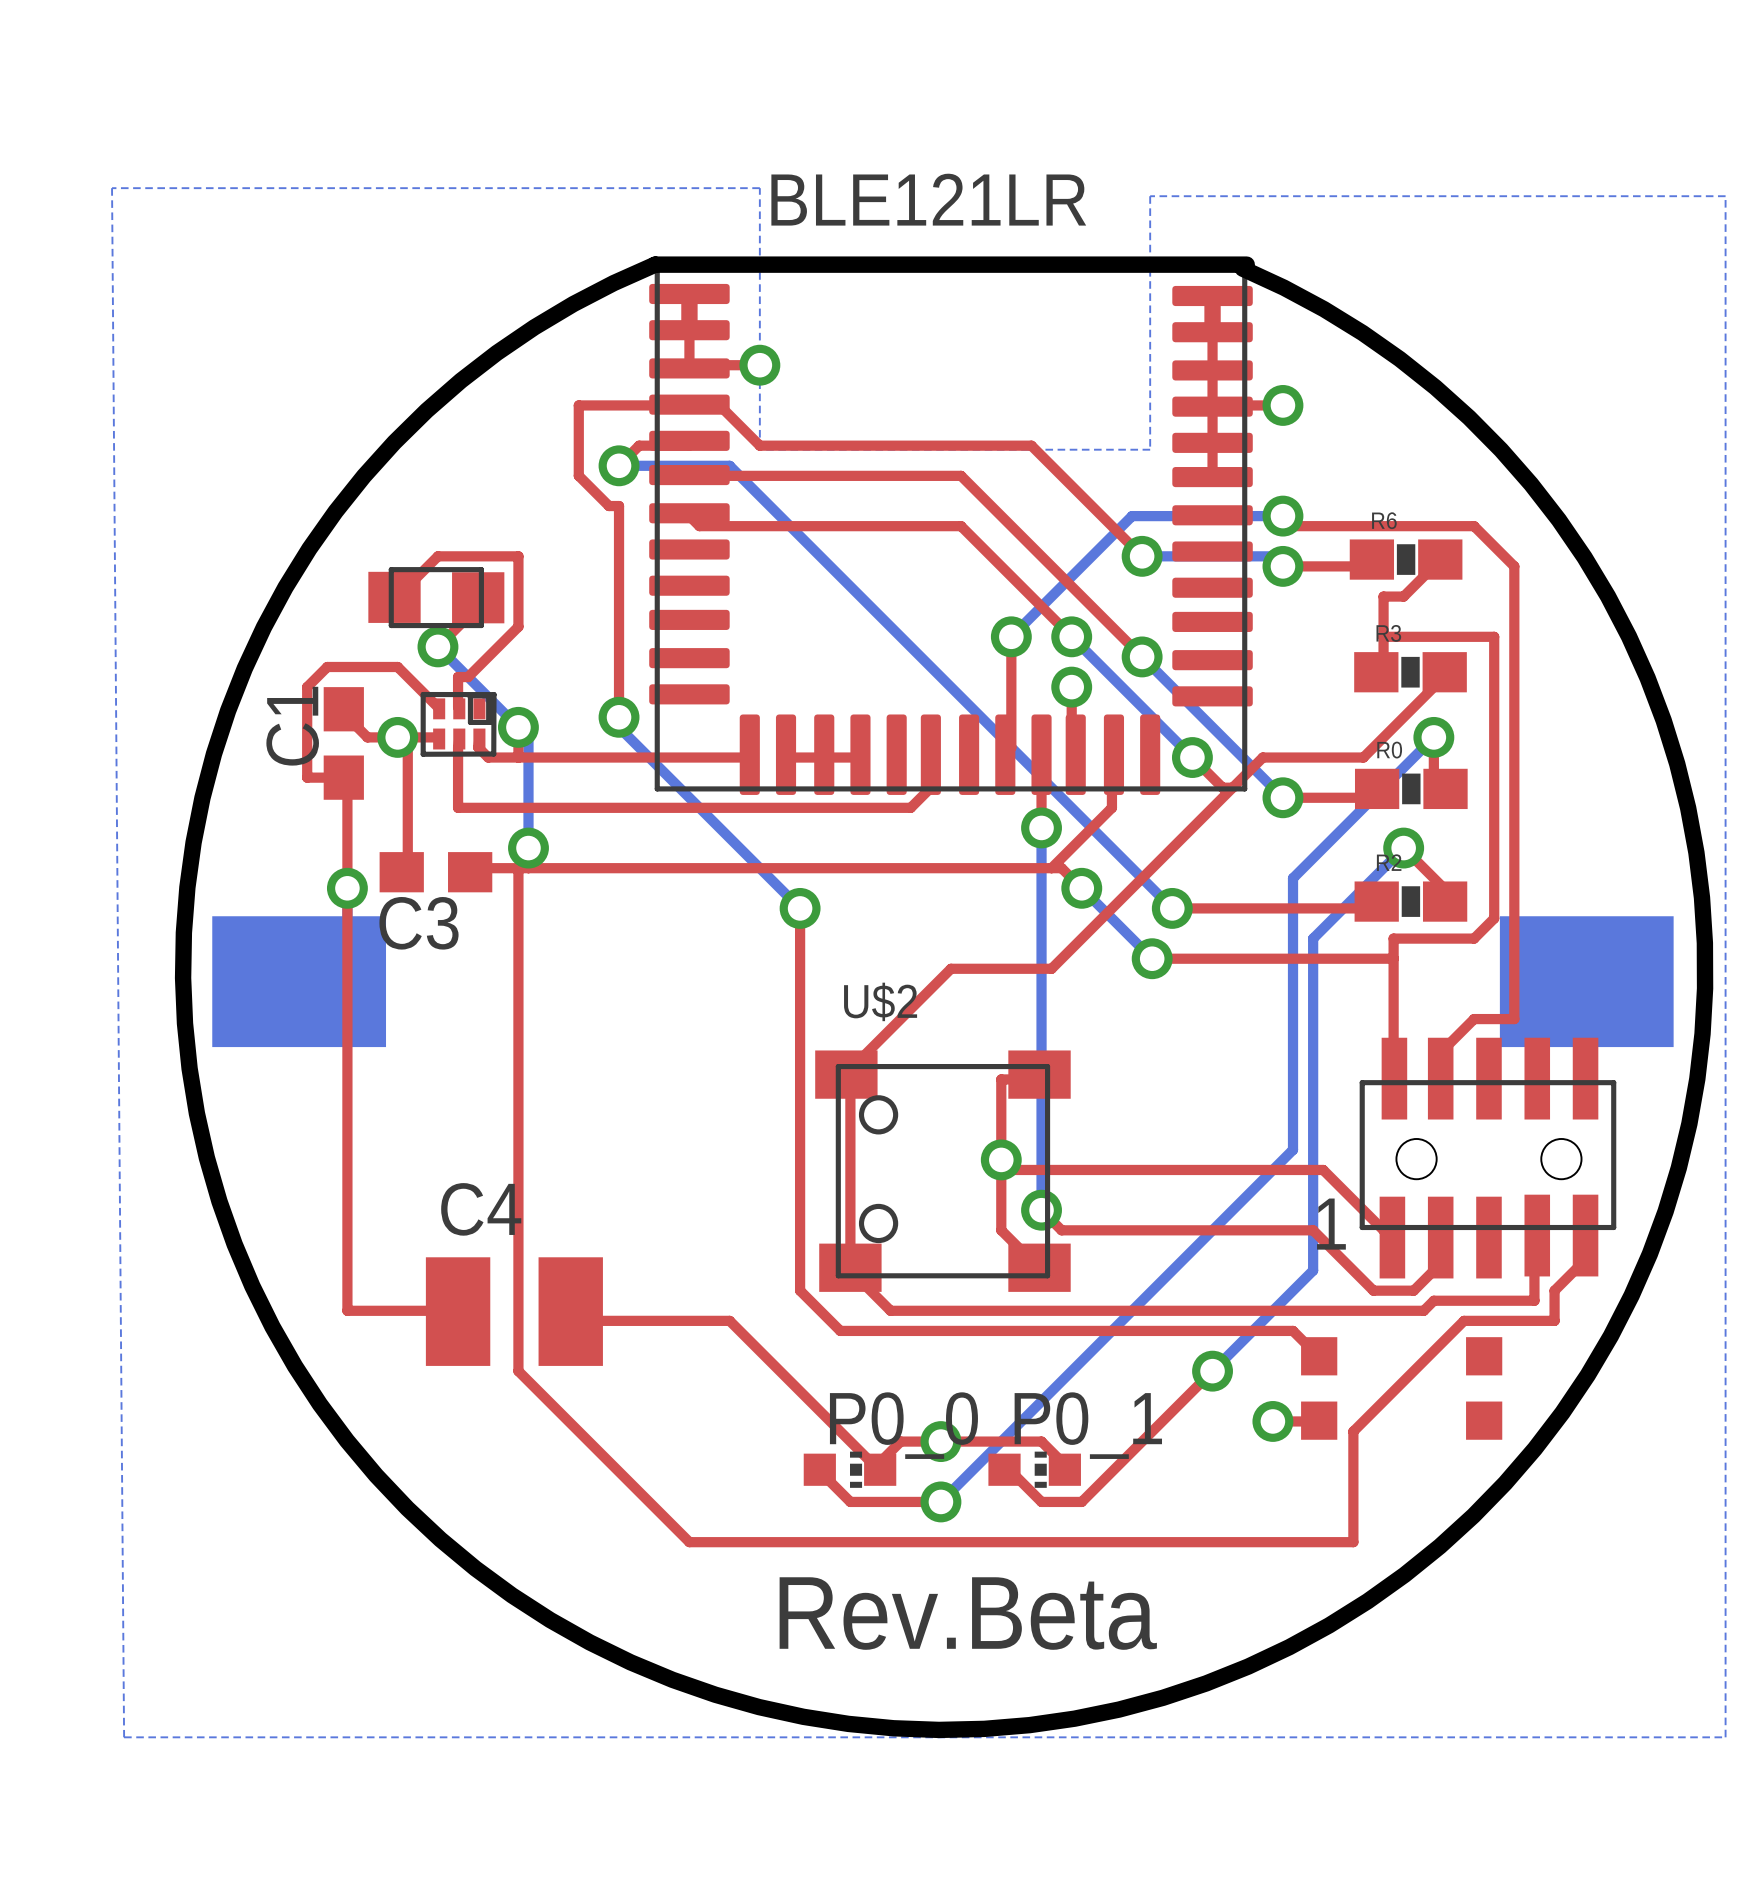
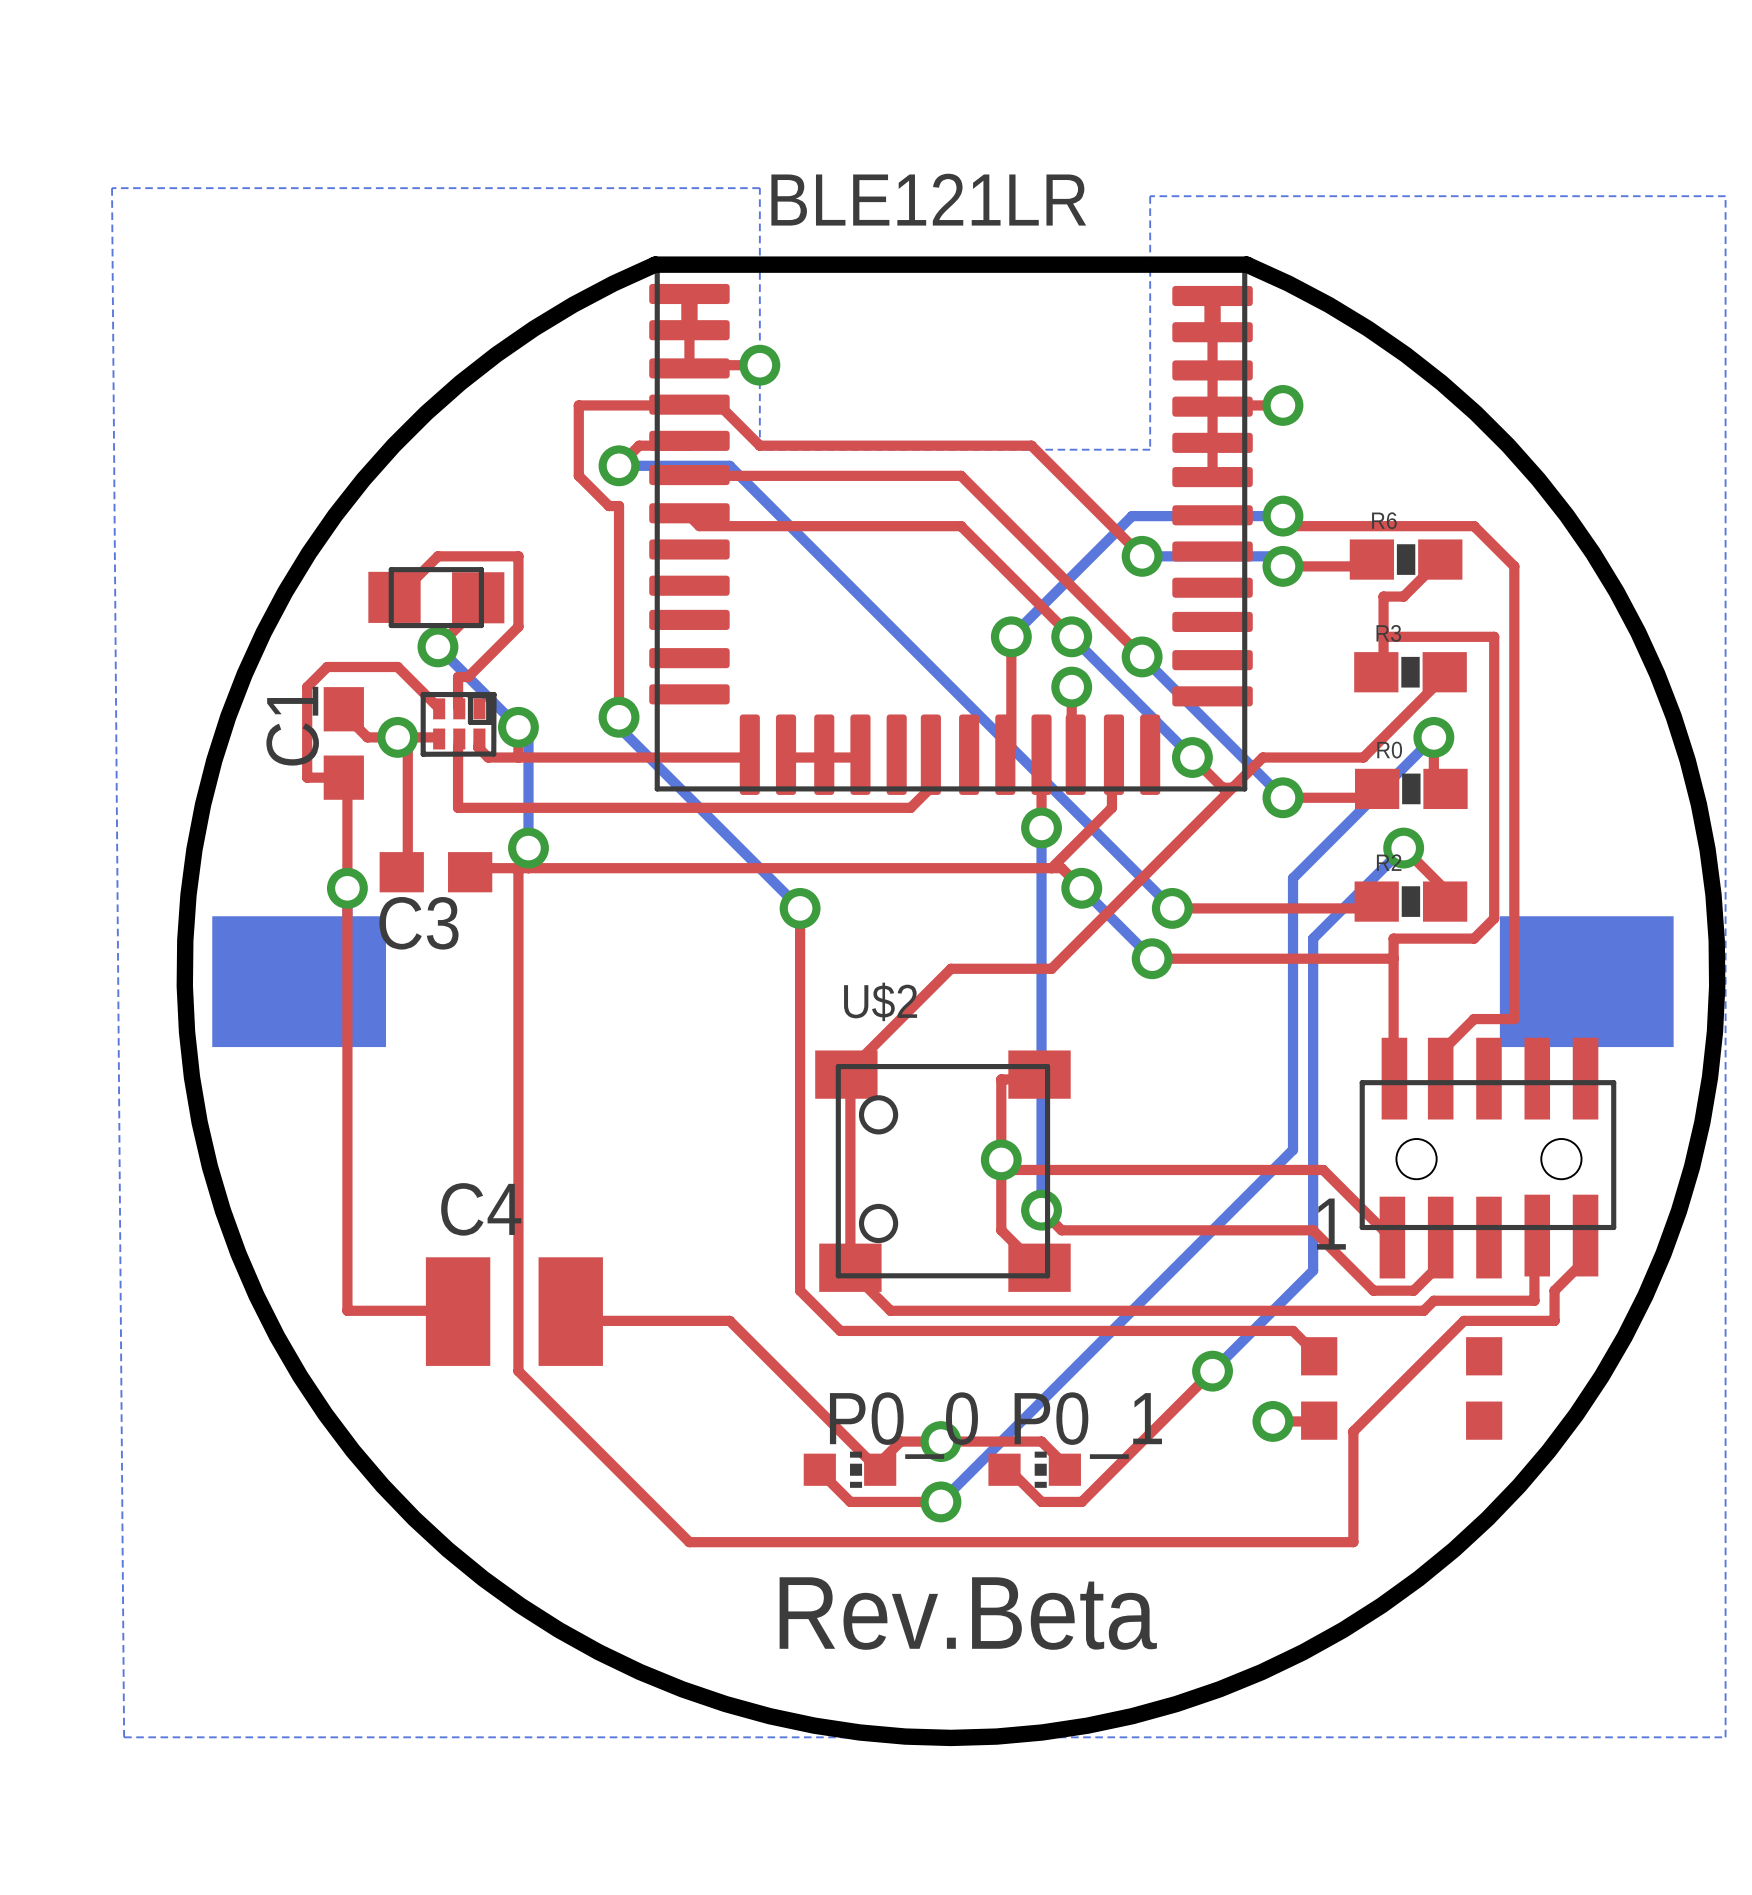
board edge: (655, 264) (573, 304) (534, 327) (460, 380) (426, 410) (394, 442) (335, 511) (285, 587) (263, 627) (244, 668) (213, 753) (193, 842) (183, 932) (183, 978) (189, 1068) (196, 1113) (219, 1201) (252, 1286) (272, 1326) (295, 1366) (346, 1440) (376, 1475) (440, 1539) (512, 1595) (550, 1620) (630, 1662) (672, 1679) (759, 1707) (803, 1716) (848, 1723) (938, 1729) (1029, 1725) (1074, 1718) (1119, 1709) (1206, 1683) (1248, 1666) (1329, 1625) (1367, 1601) (1439, 1546) (1505, 1483) (1534, 1448) (1587, 1375) (1610, 1335) (1649, 1253) (1665, 1211) (1689, 1123) (1702, 1033) (1705, 988) (1704, 943) (1696, 852) (1677, 763) (1663, 720) (1647, 678) (1608, 596) (1584, 557) (1531, 484) (1469, 417) (1399, 359) (1362, 332) (1323, 309) (1242, 268) -> (655, 264) (613, 283) (534, 328) (460, 382) (426, 413) (393, 445) (335, 515) (285, 592) (263, 632) (244, 674) (214, 760) (194, 849) (188, 894) (185, 940) (187, 1031) (199, 1122) (209, 1166) (238, 1253) (256, 1295) (300, 1376) (325, 1414) (382, 1485) (414, 1518) (483, 1578) (558, 1630) (598, 1652) (640, 1672) (725, 1704) (814, 1725) (859, 1732) (950, 1737) (1042, 1732) (1087, 1725) (1176, 1704) (1261, 1672) (1303, 1652) (1343, 1630) (1418, 1578) (1487, 1518) (1519, 1485) (1576, 1414) (1601, 1376) (1645, 1295) (1663, 1253) (1692, 1166) (1702, 1122) (1714, 1031) (1716, 940) (1713, 894) (1707, 849) (1687, 760) (1657, 674) (1638, 632) (1616, 592) (1566, 515) (1508, 445) (1475, 413) (1441, 382) (1367, 328) (1288, 283) (1246, 264)

